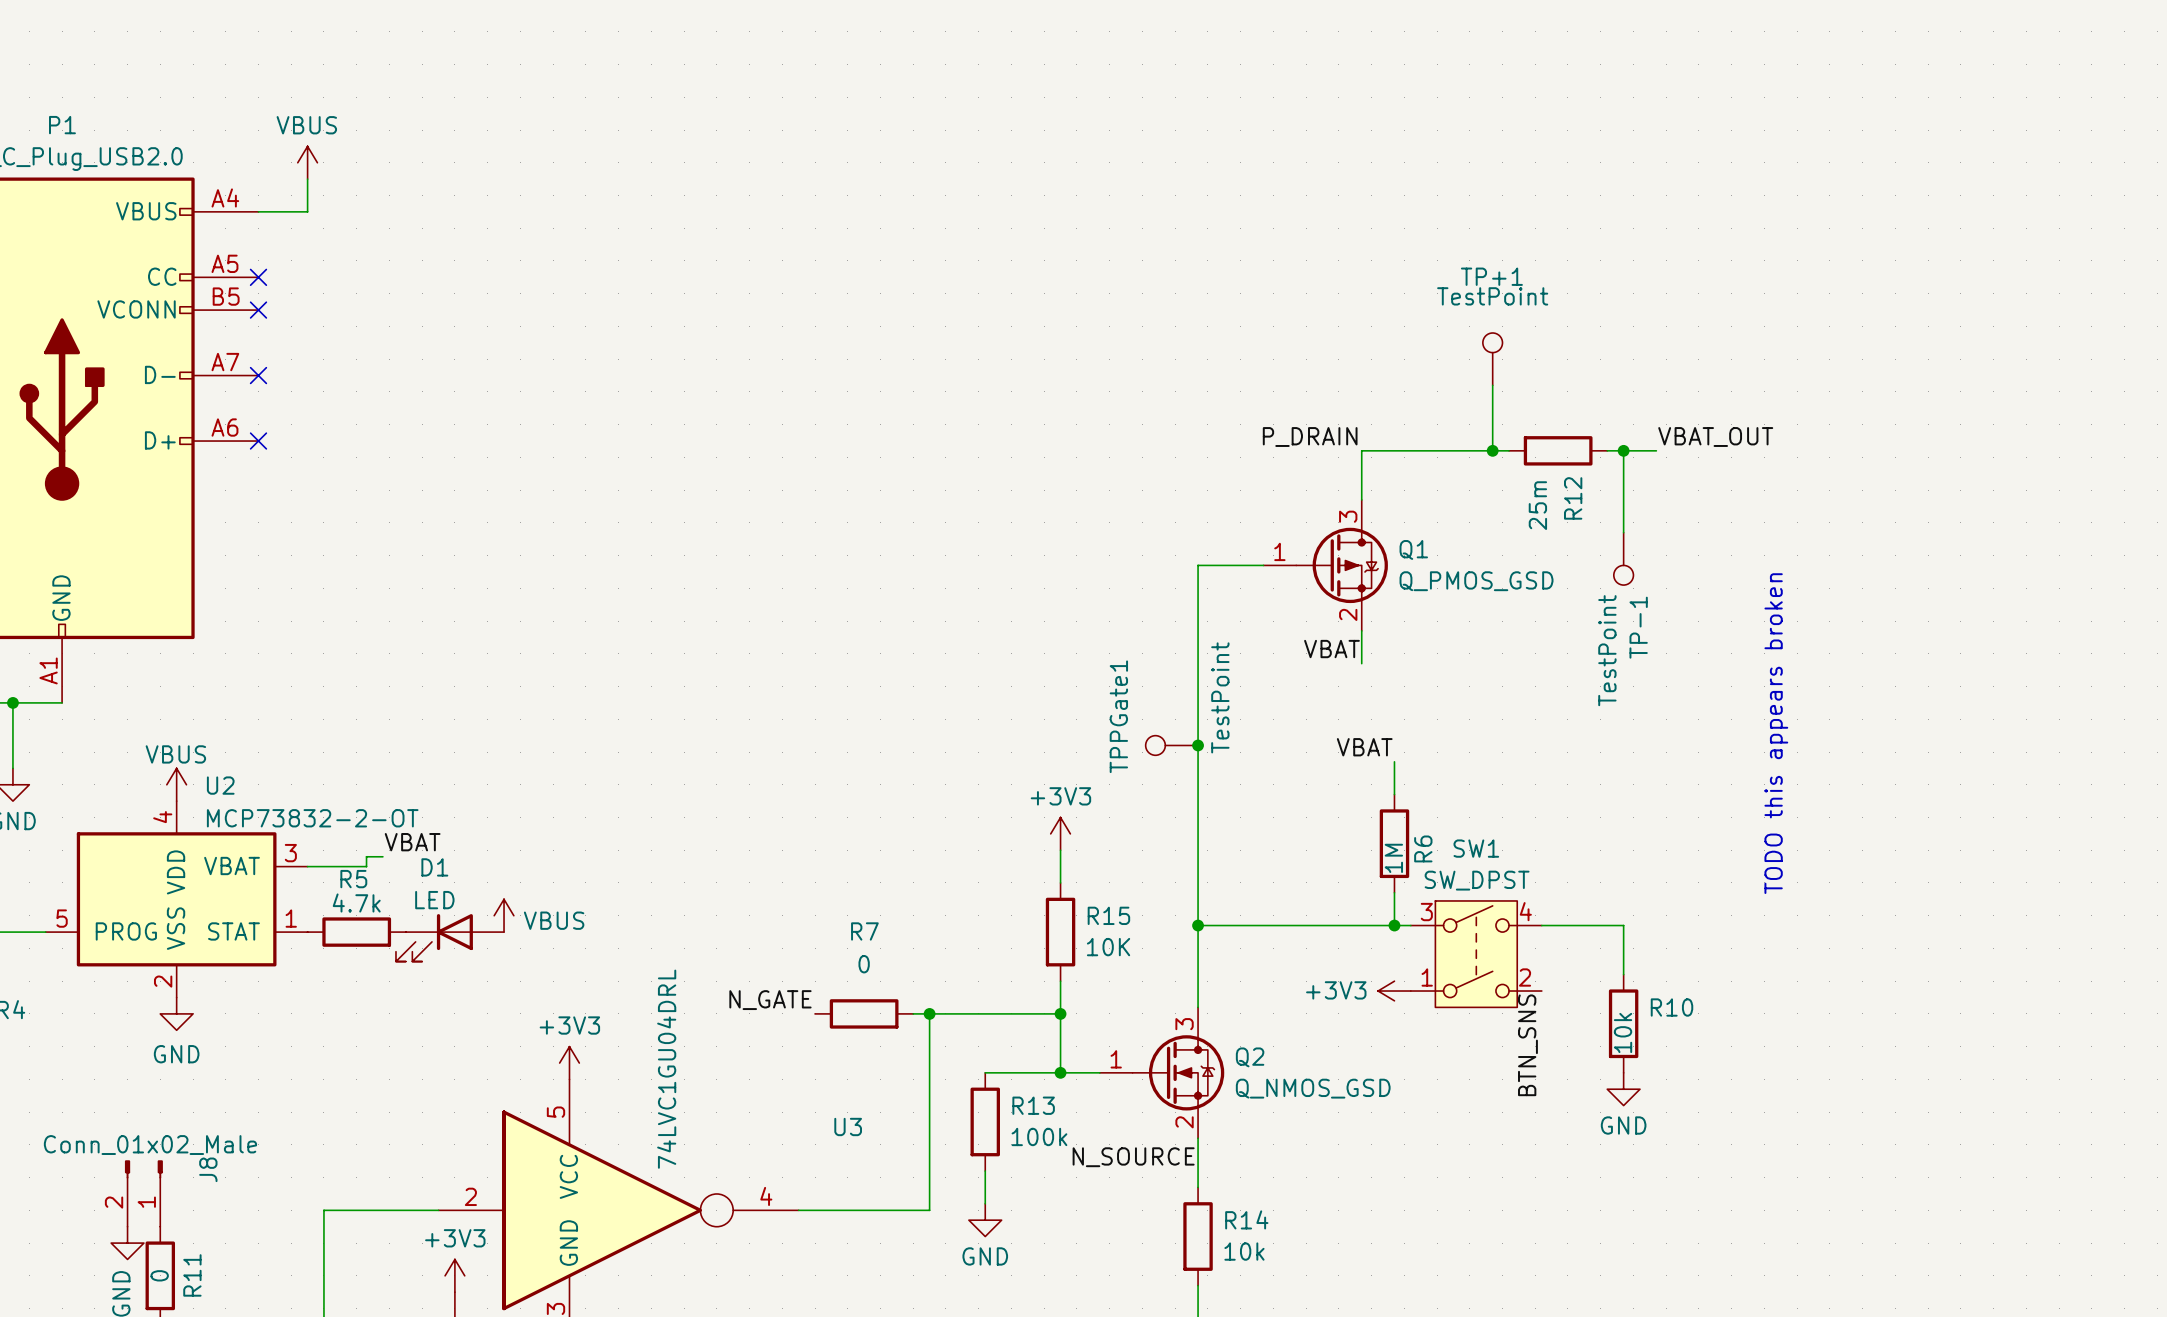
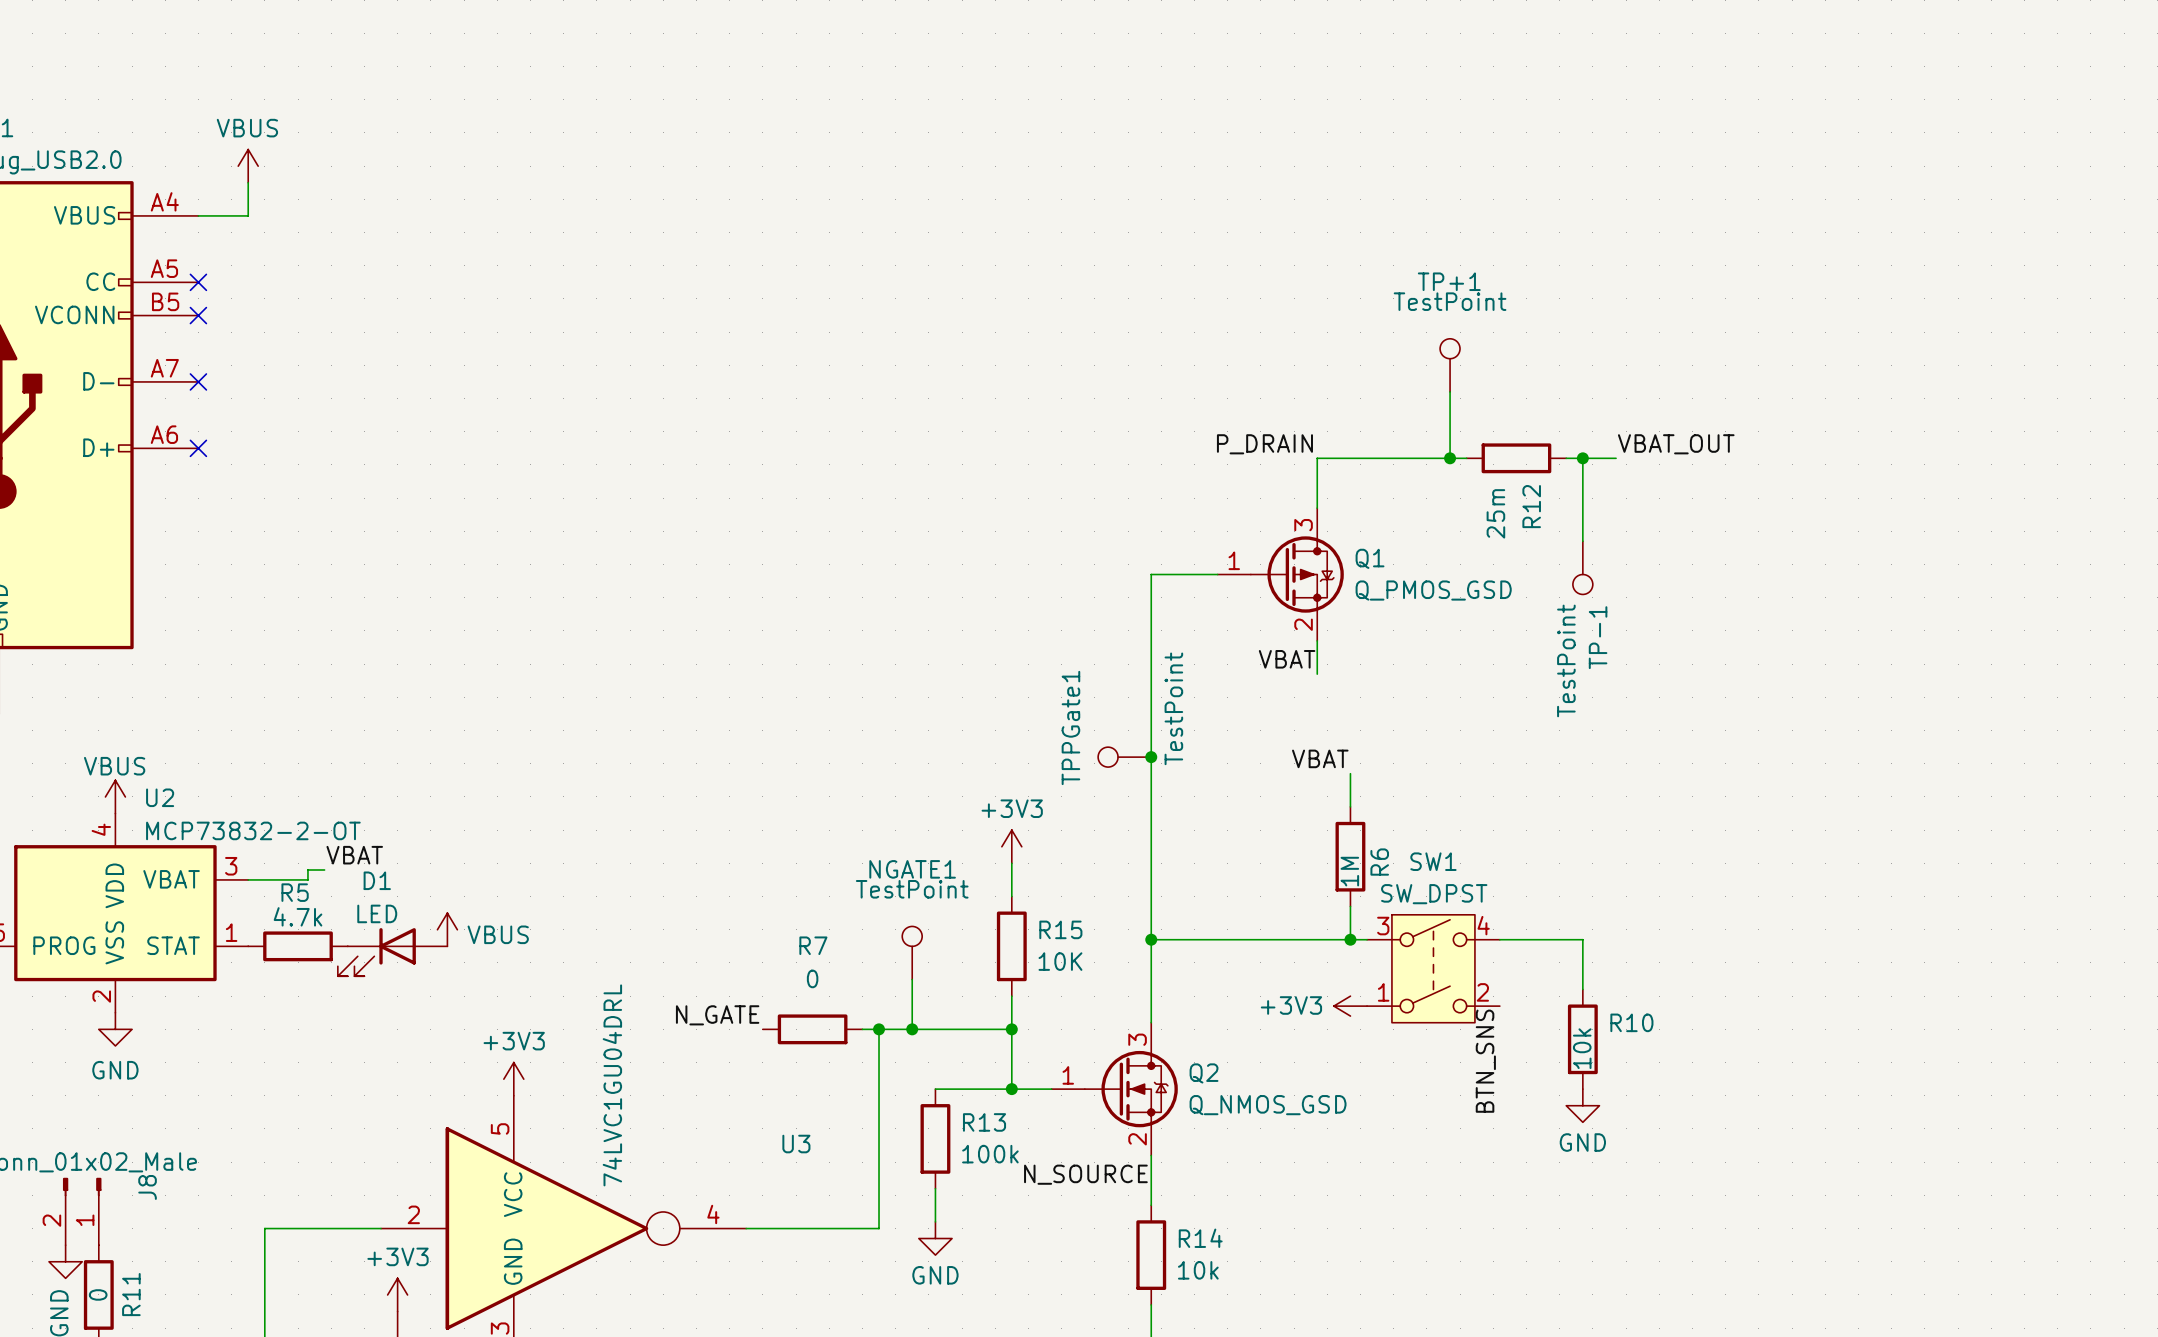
text: TODO this appears broken (1776, 733) -> none
NGATE1: none -> TestPoint (912, 952)
wire: none -> (912, 979) (912, 1029)
junction: none -> (912, 1029)

